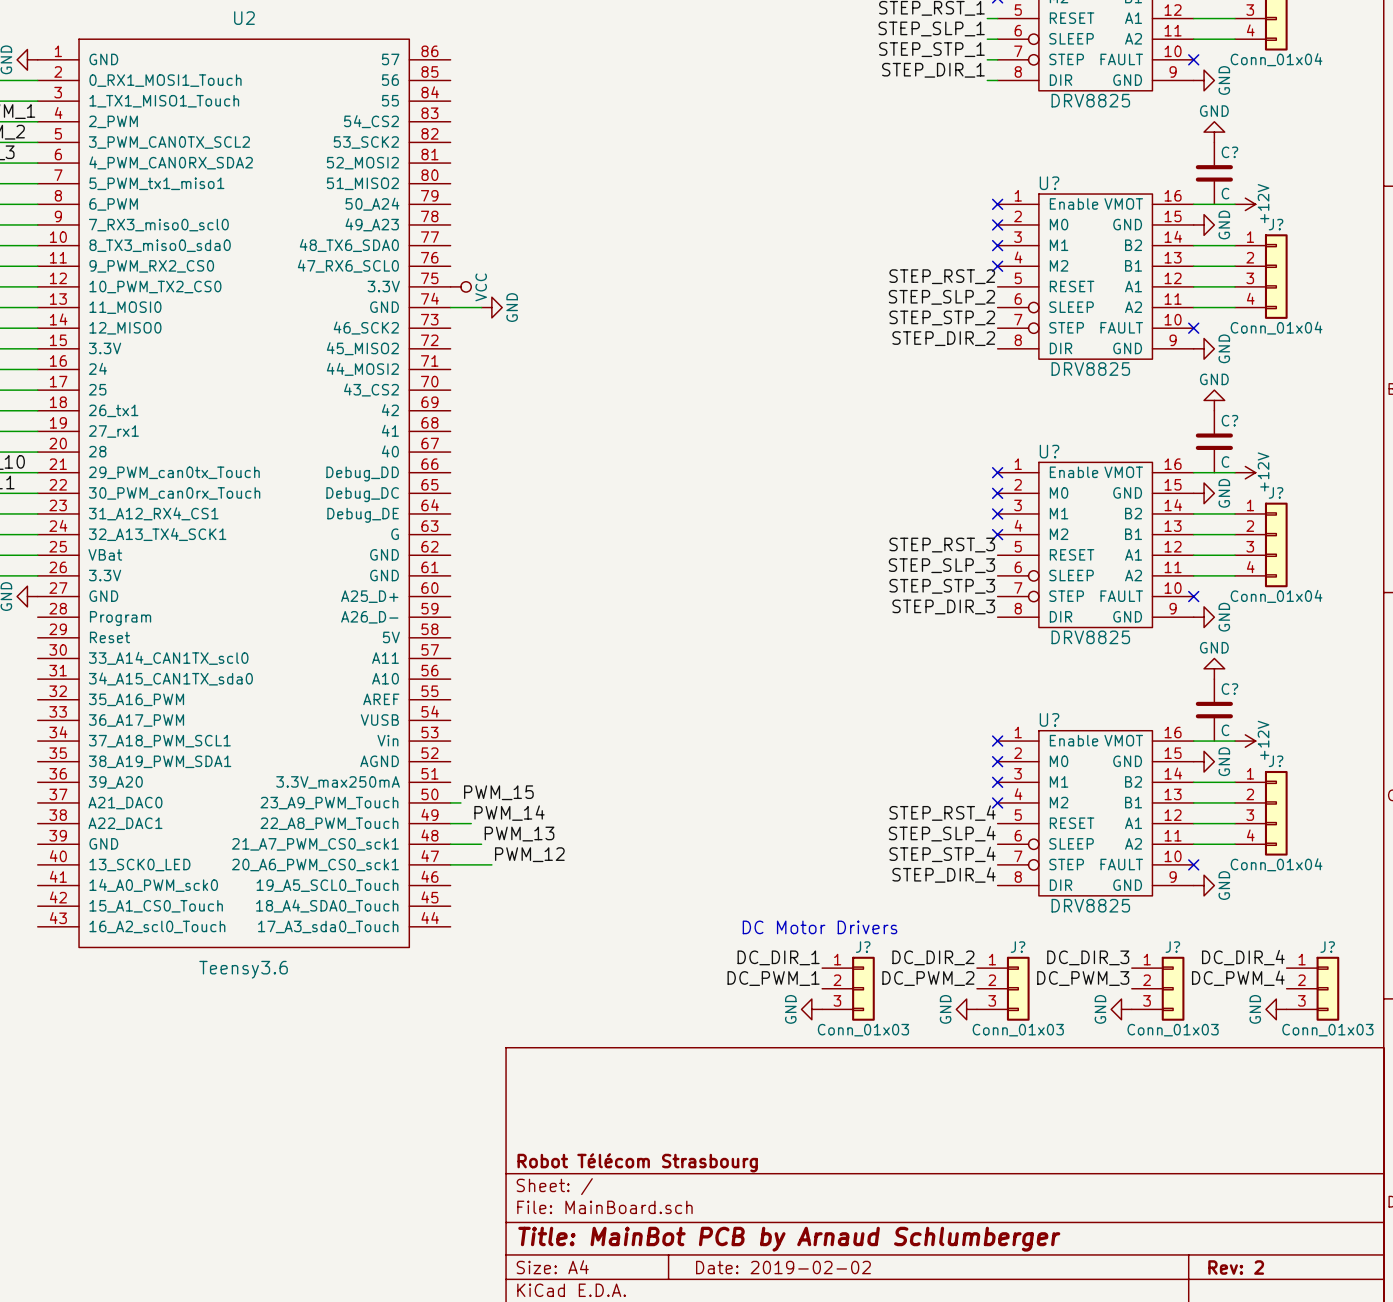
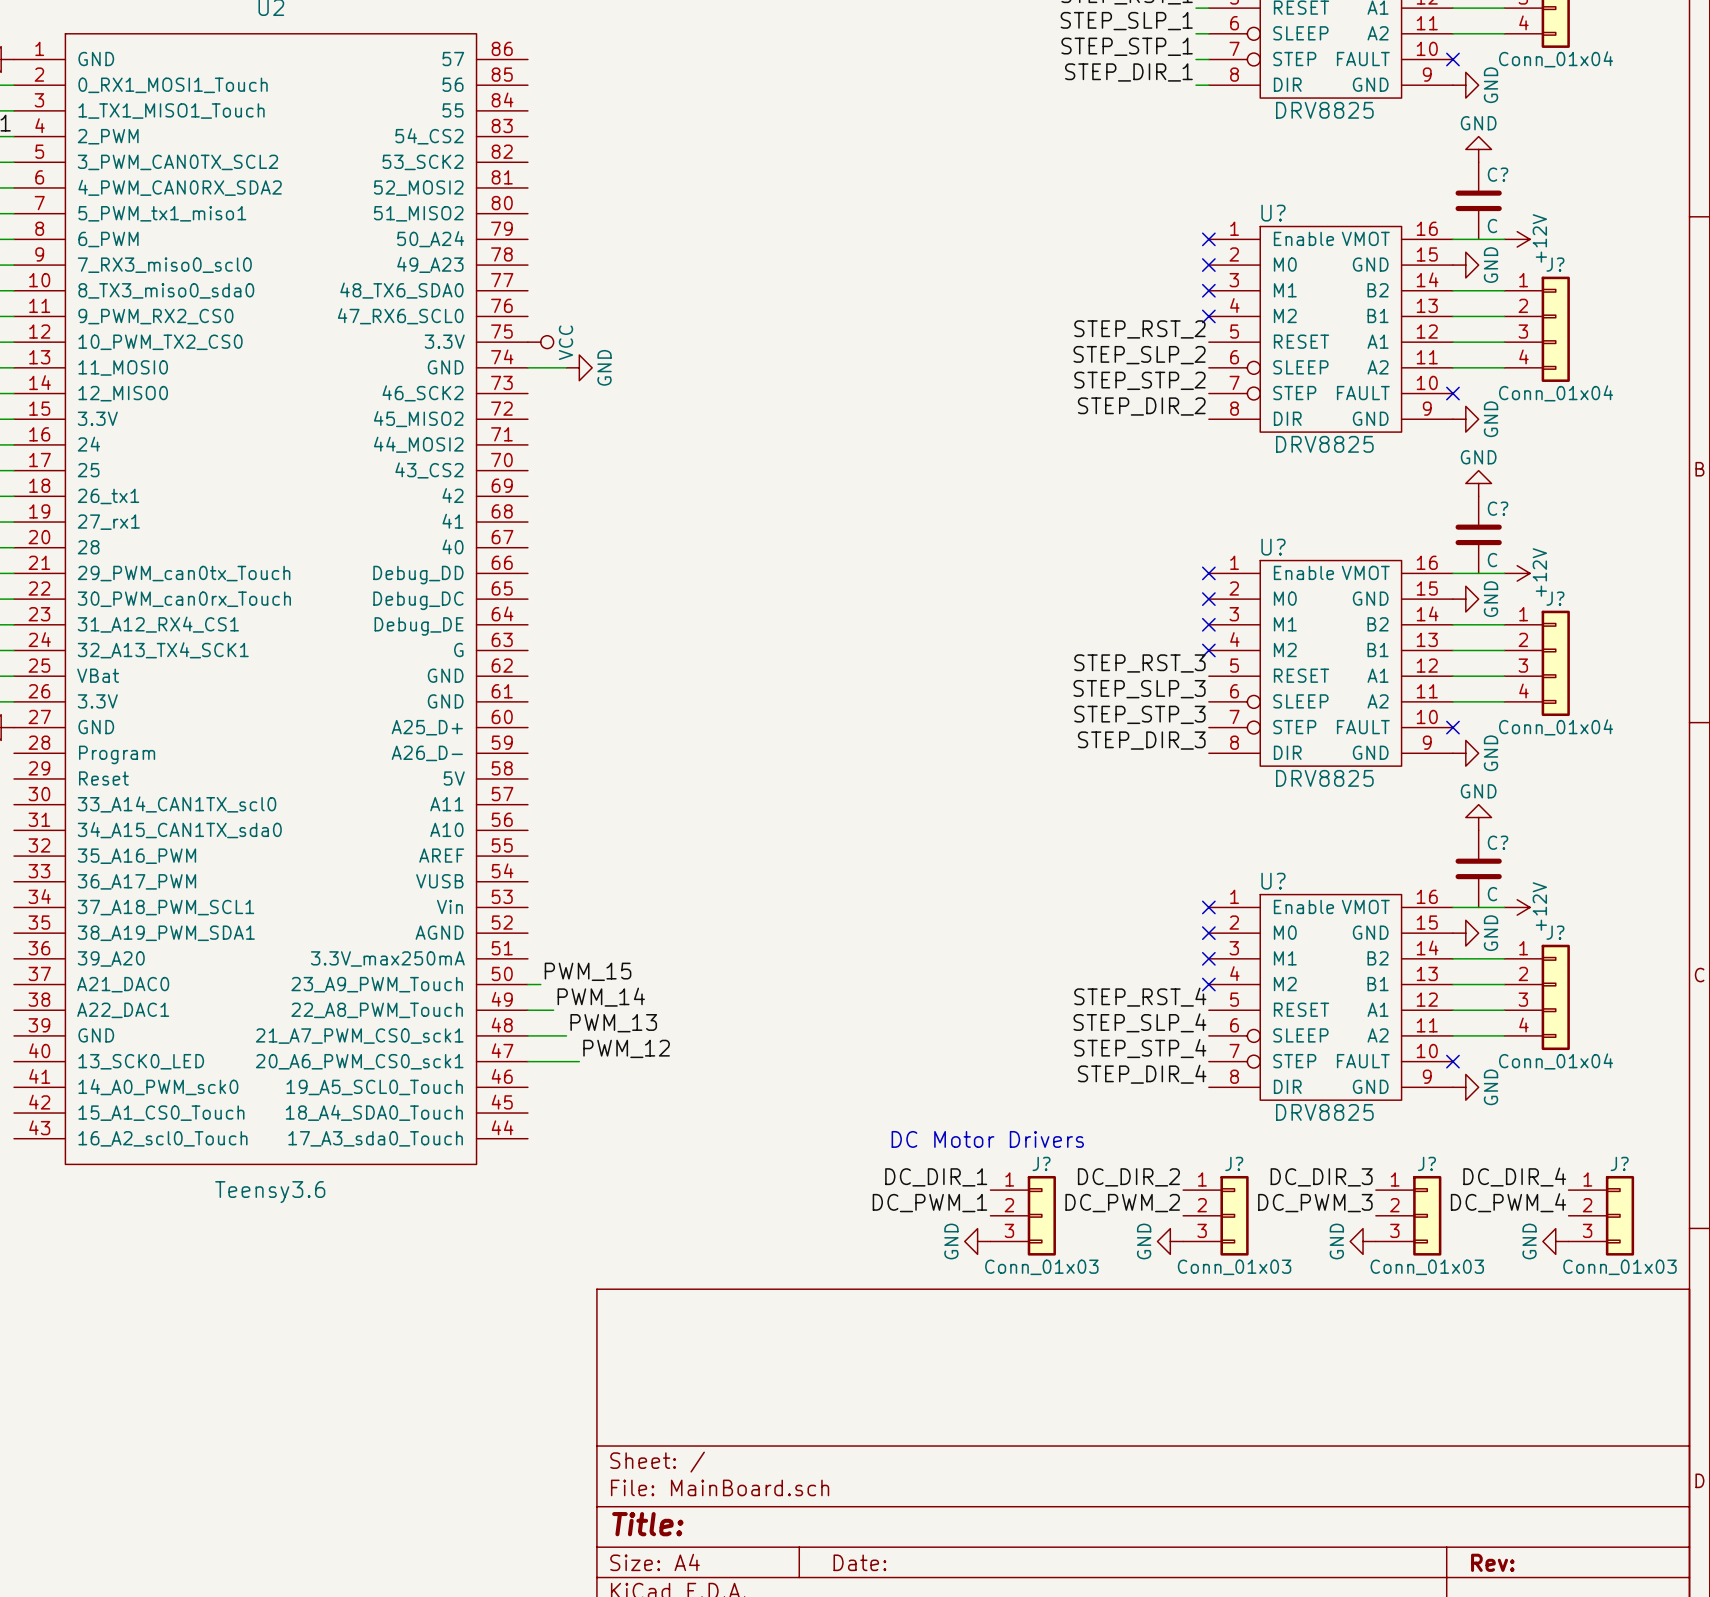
title block: Robot Télécom Strasbourg (637, 1162) -> none
title block: Title: MainBot PCB by Arnaud Schlumberger (789, 1239) -> Title: (647, 1524)
title block: Date: 2019-02-02 (783, 1267) -> Date: (859, 1562)
title block: Rev: 2 (1236, 1267) -> Rev: (1492, 1562)

